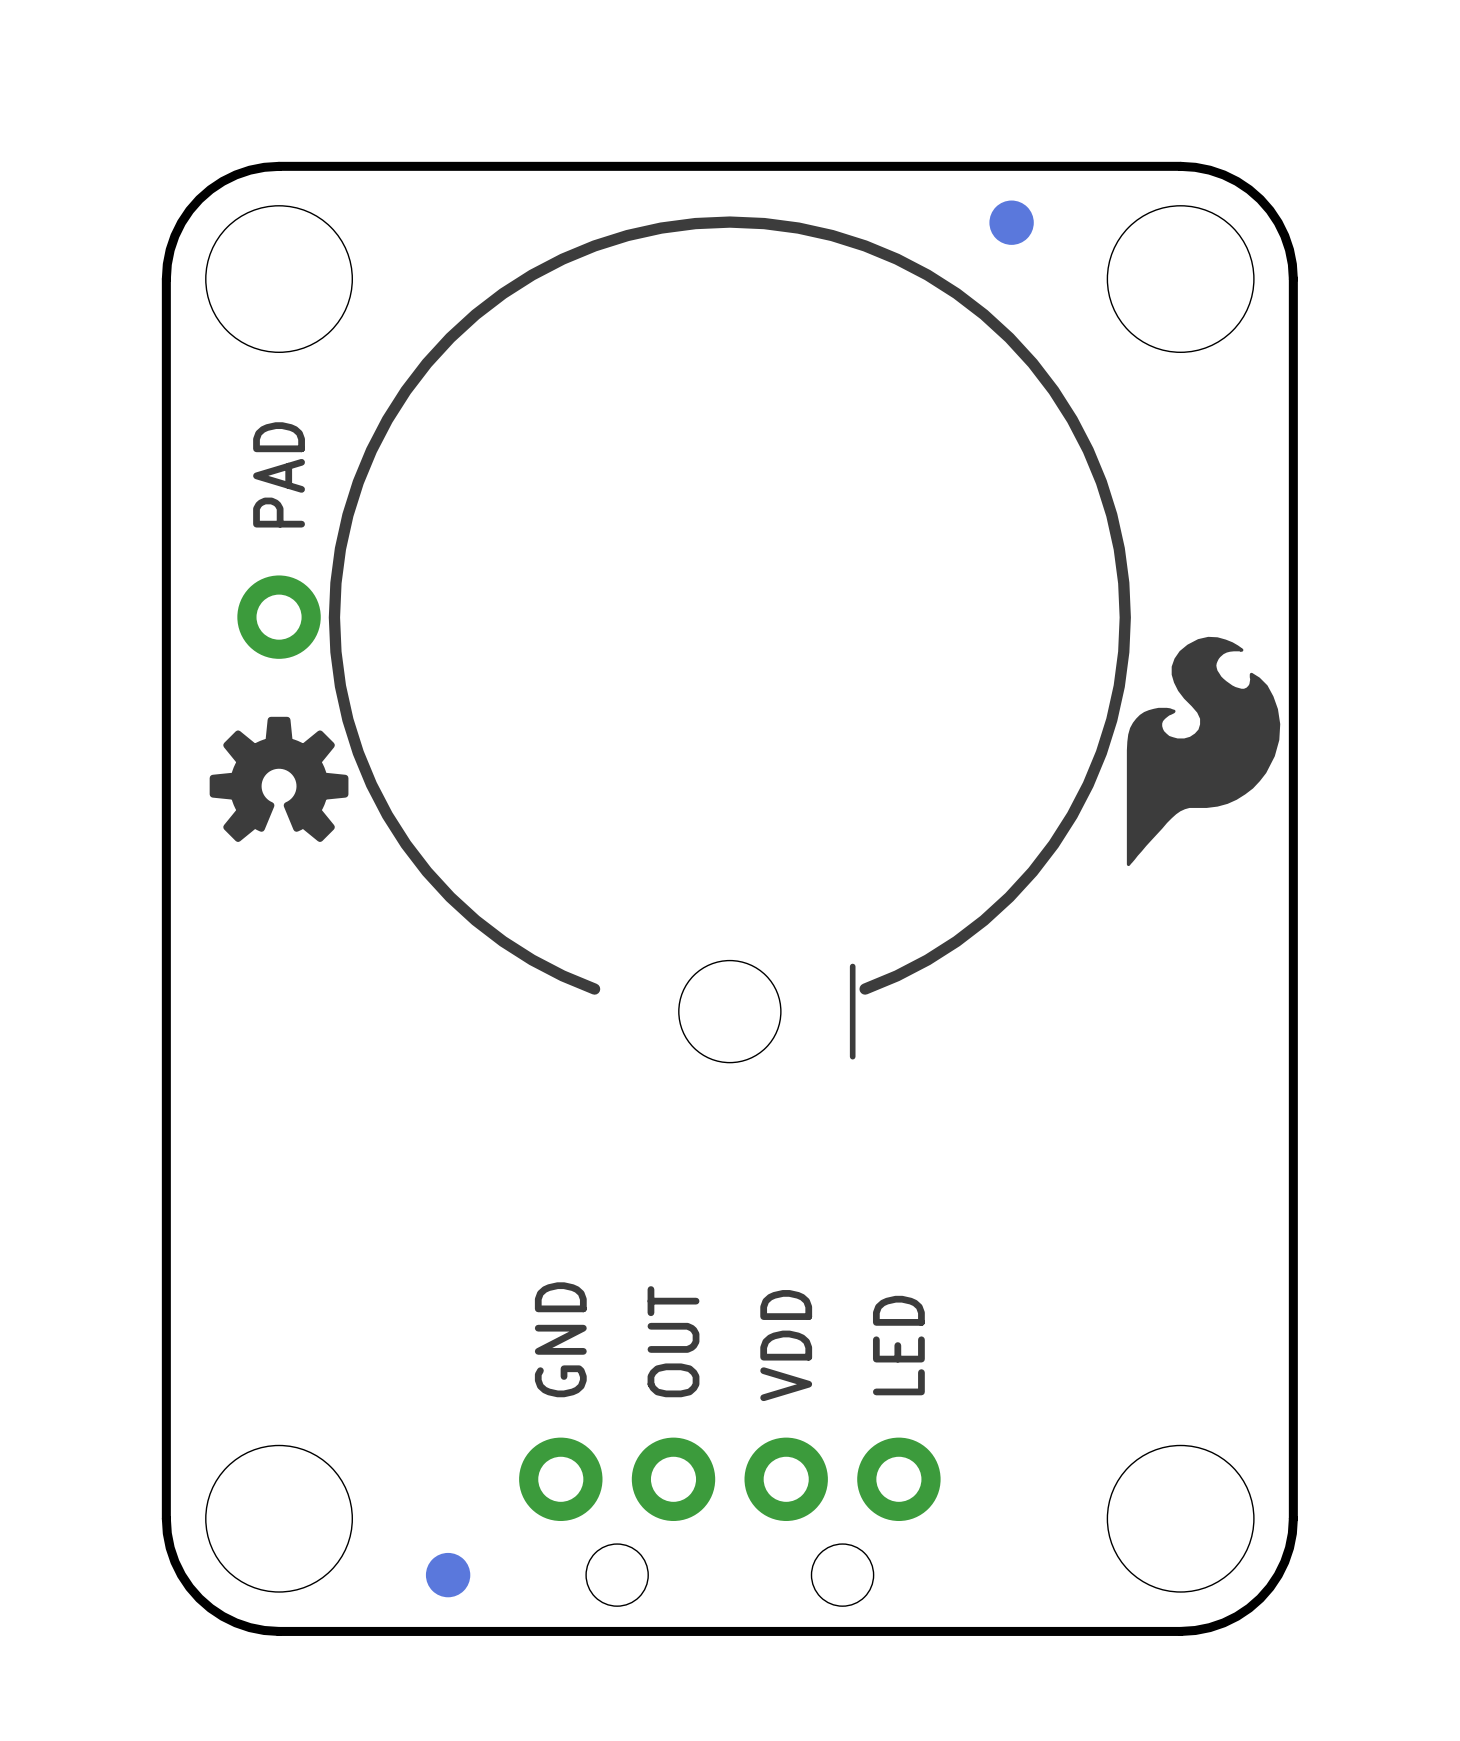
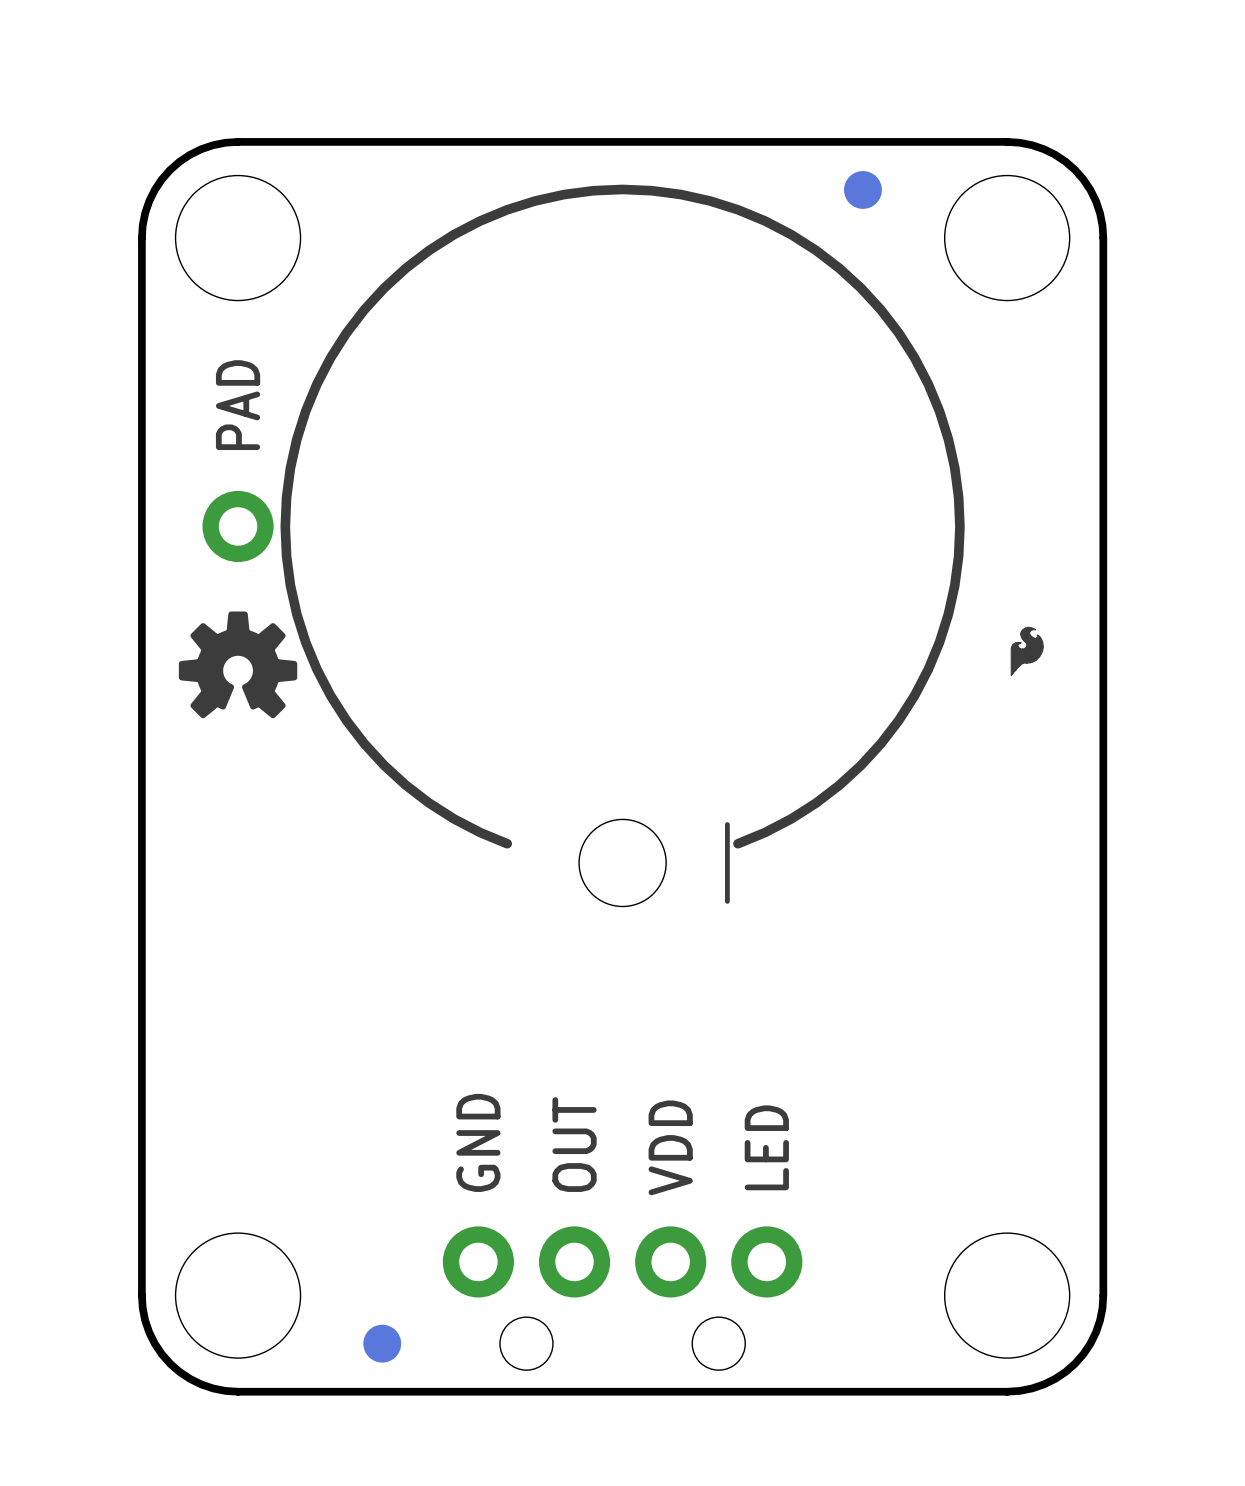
drawing shape: [1126, 636, 1281, 867] -> [1010, 626, 1044, 676]

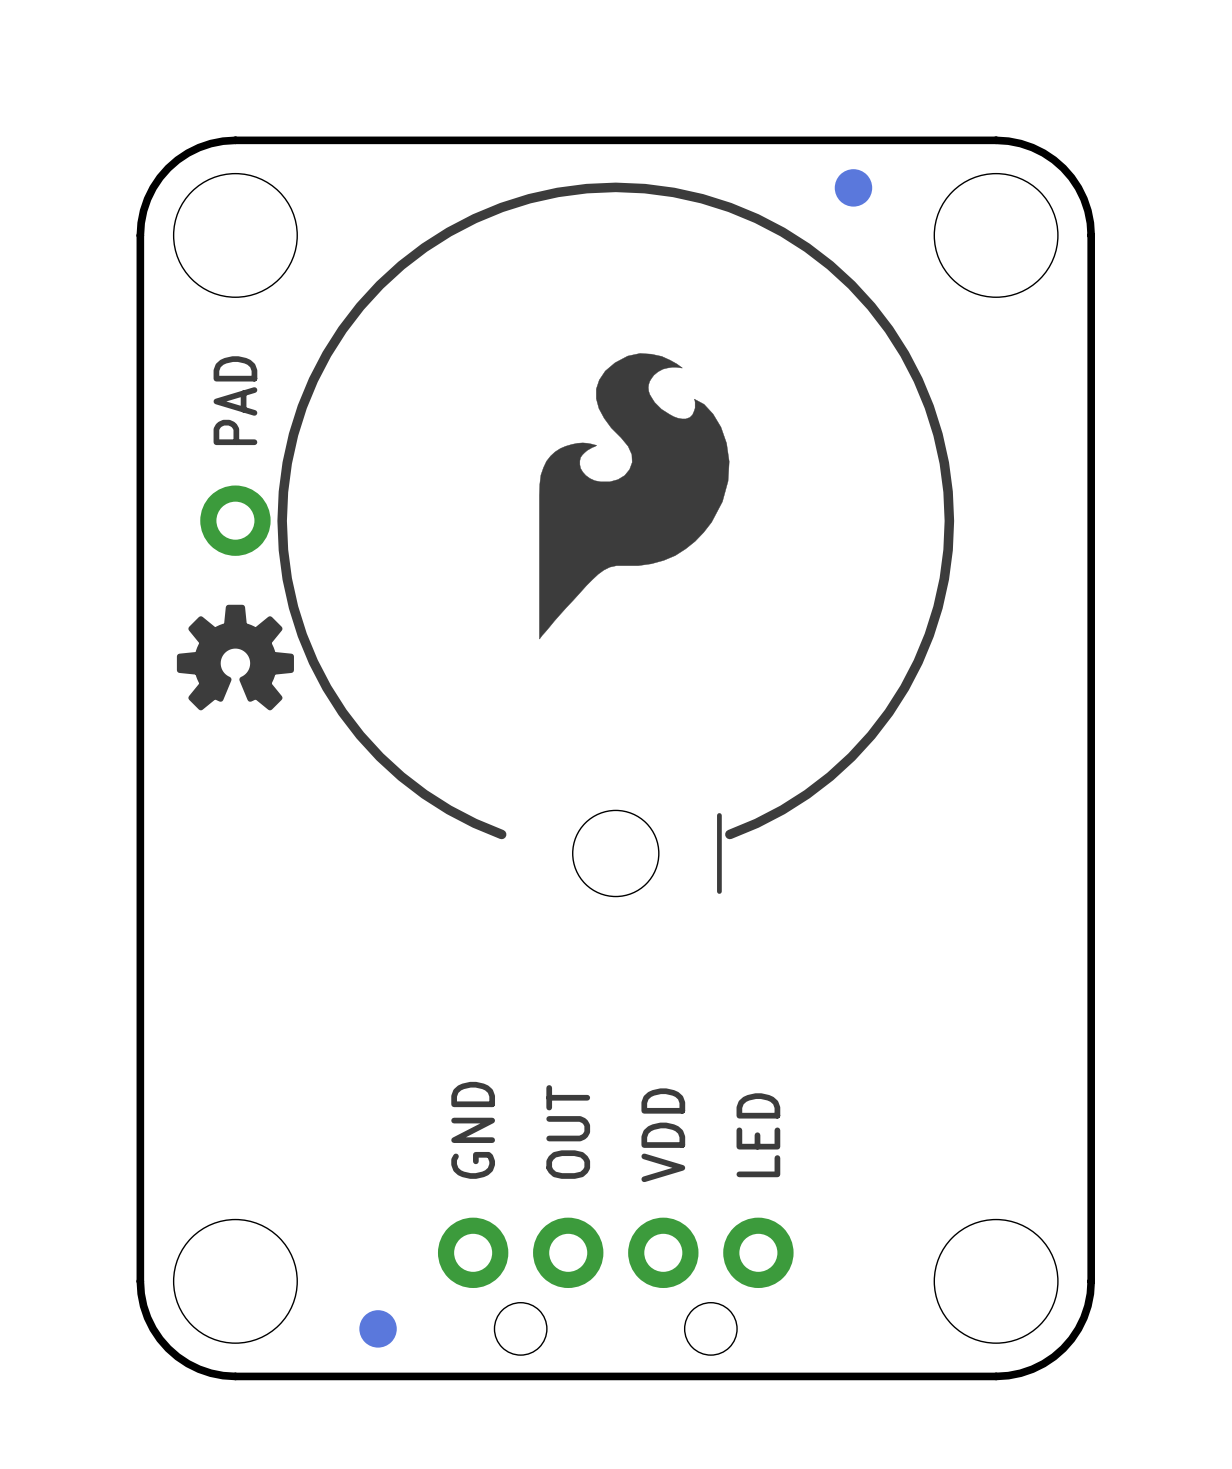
drawing: none -> [539, 353, 730, 640]
drawing: [1010, 626, 1044, 676] -> none
part: (622, 1261) -> none
part: none -> (473, 1252)
part: none -> (568, 1252)
part: none -> (663, 1252)
part: none -> (758, 1252)

